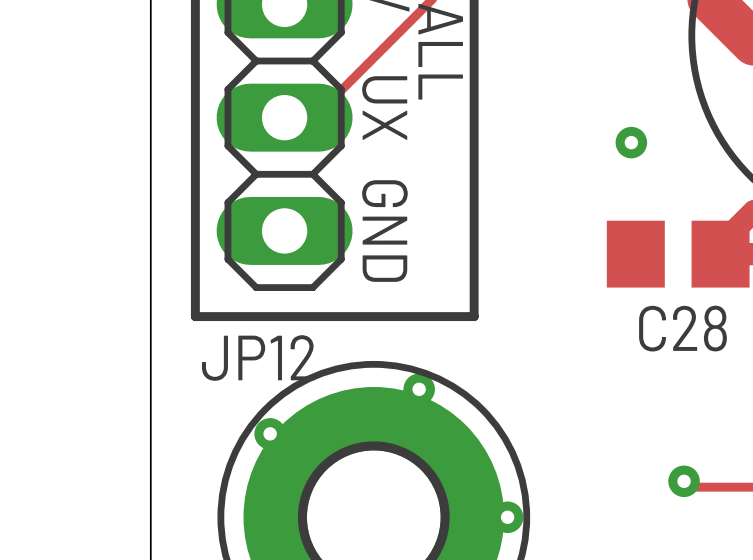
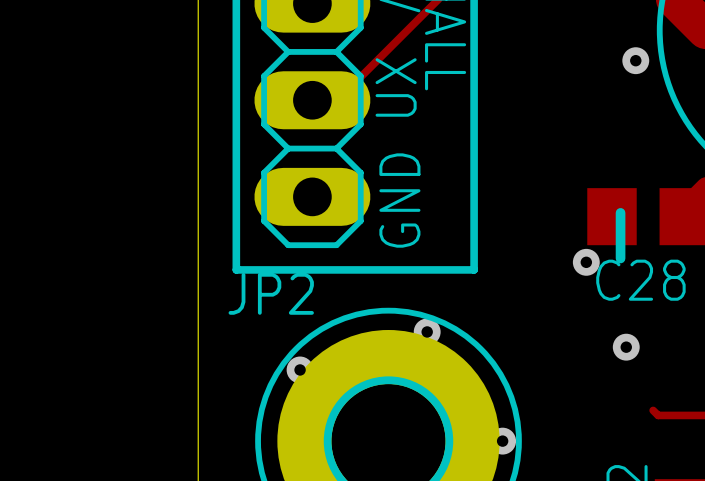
text rotation: 0° (384, 108) -> 180° (396, 87)
via position: (631, 142) -> (635, 60)
text rotation: 0° (384, 231) -> 180° (399, 200)
line: none -> (620, 212) (620, 258)
via: none -> (586, 262)
JP12 name: JP12 (258, 358) -> JP2 (271, 293)
via: none -> (626, 347)
via: (684, 481) -> none

